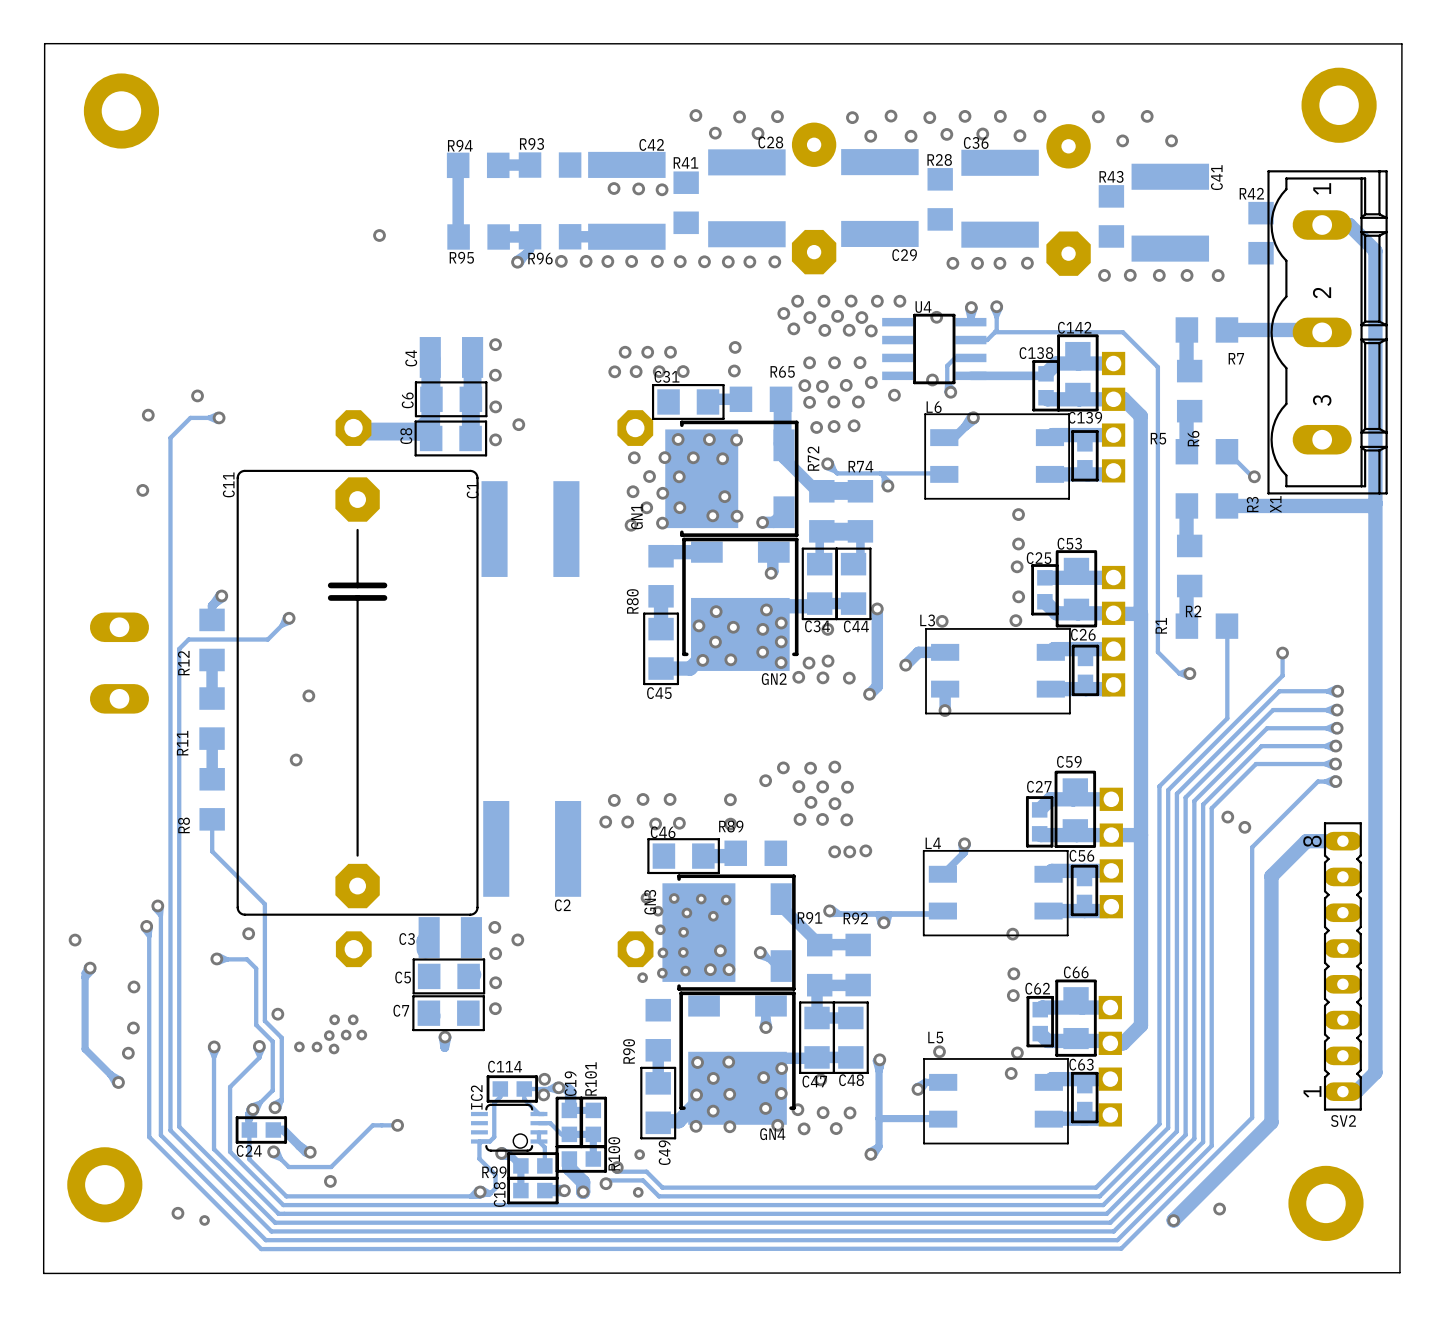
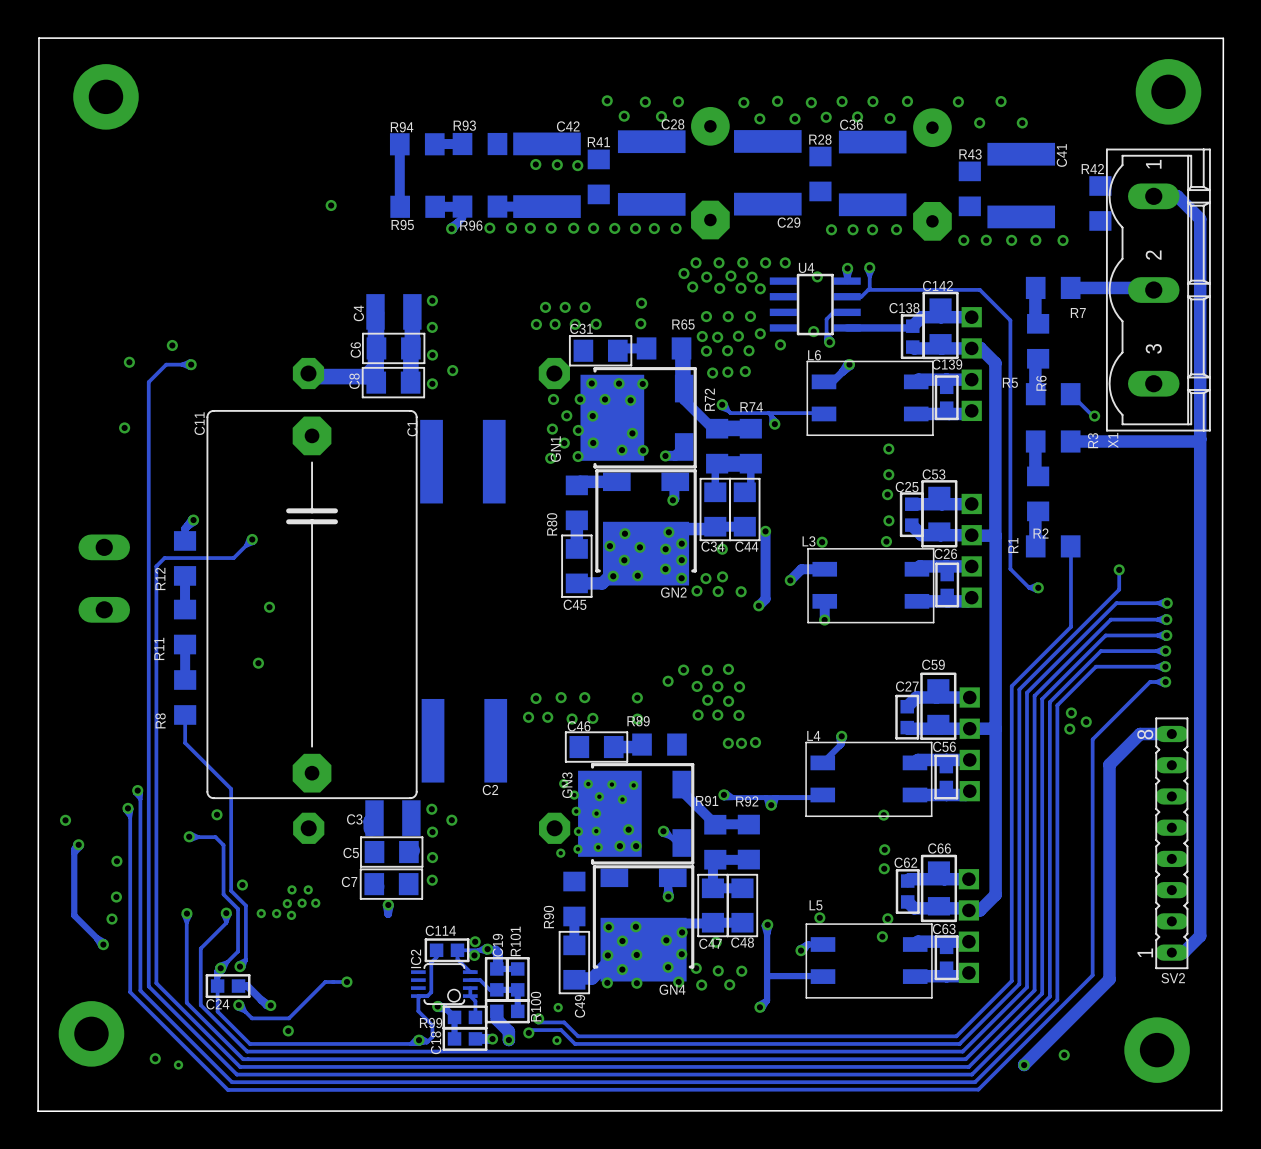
via: none -> (1069, 729)

